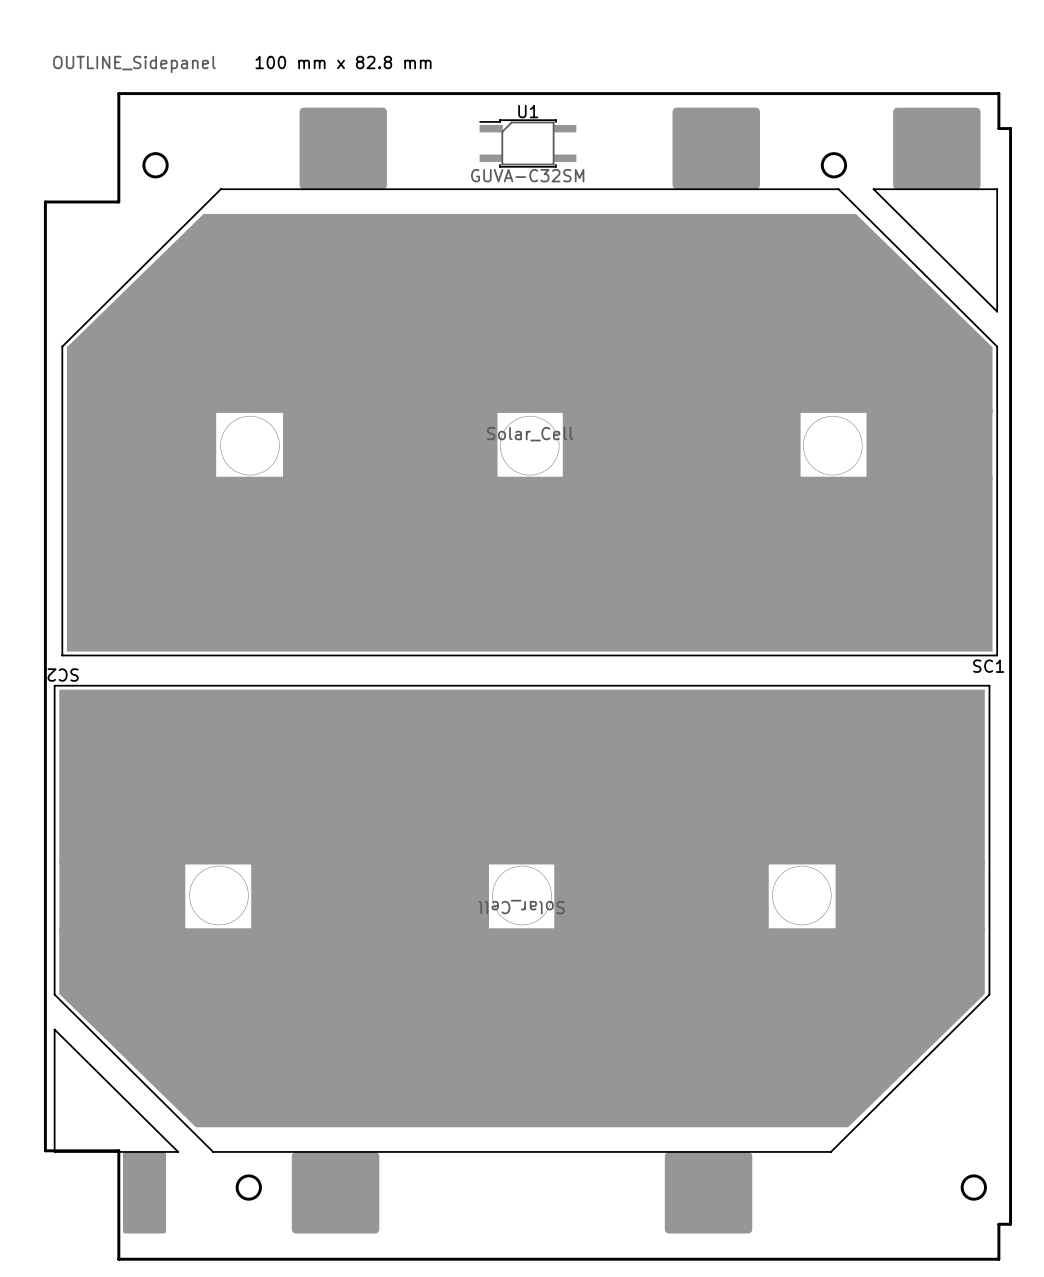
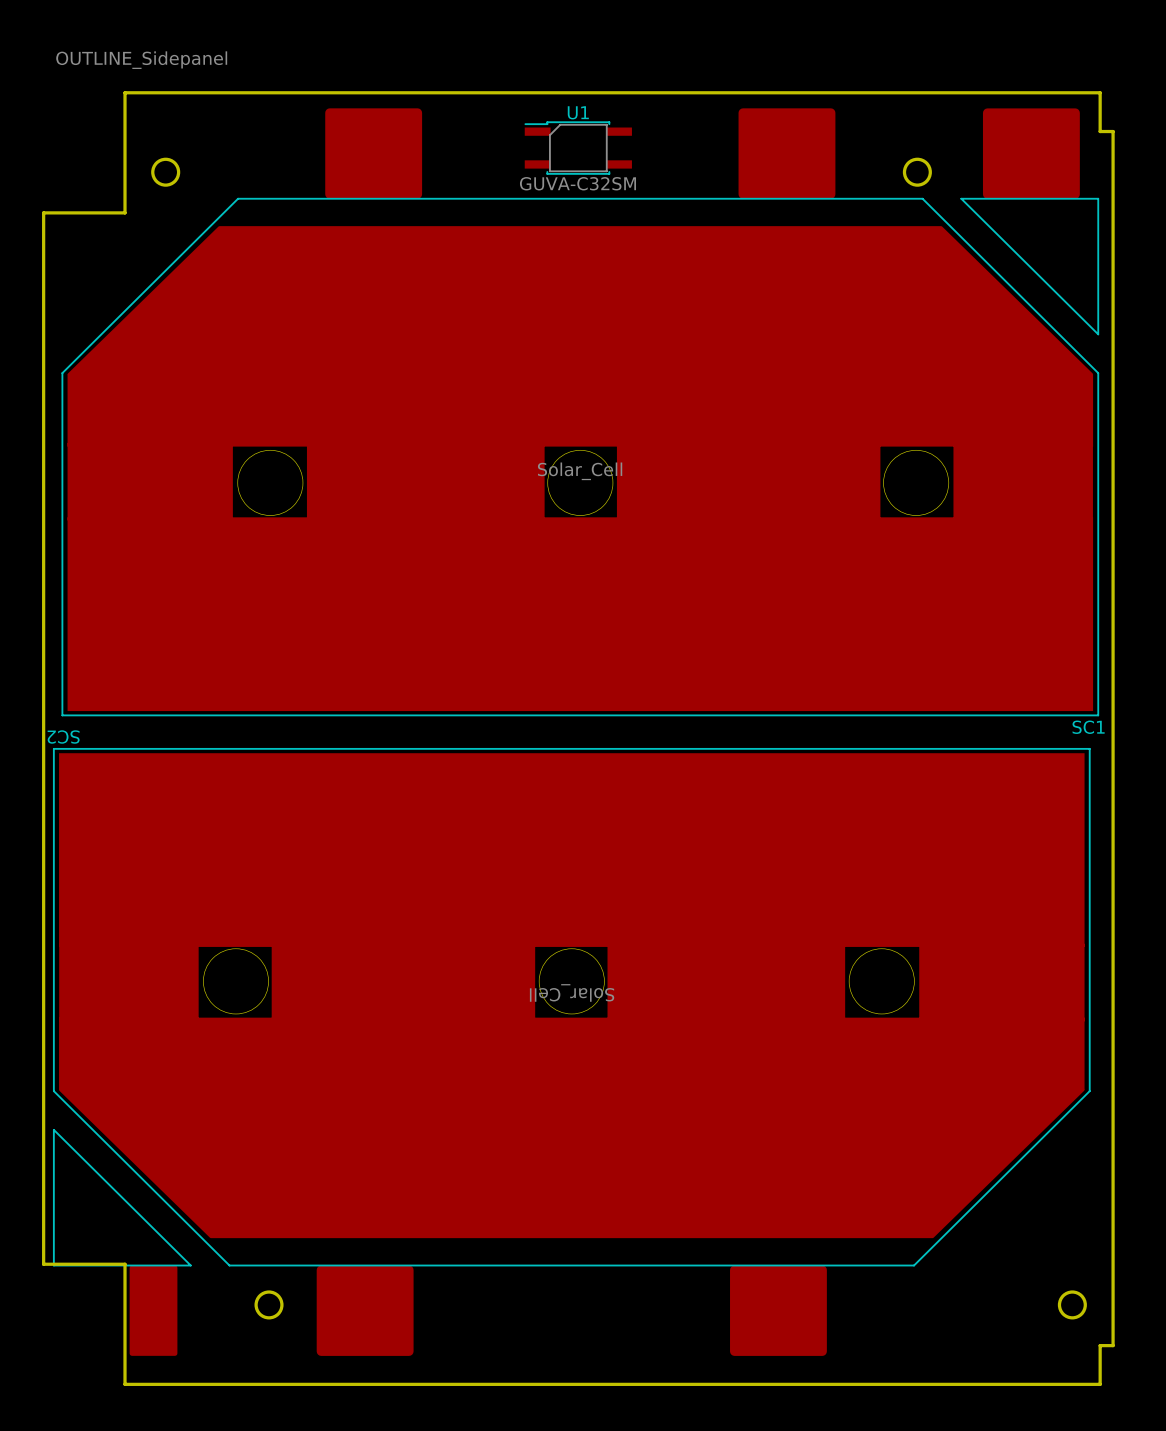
text: 100 mm x 82.8 mm (343, 62) -> none

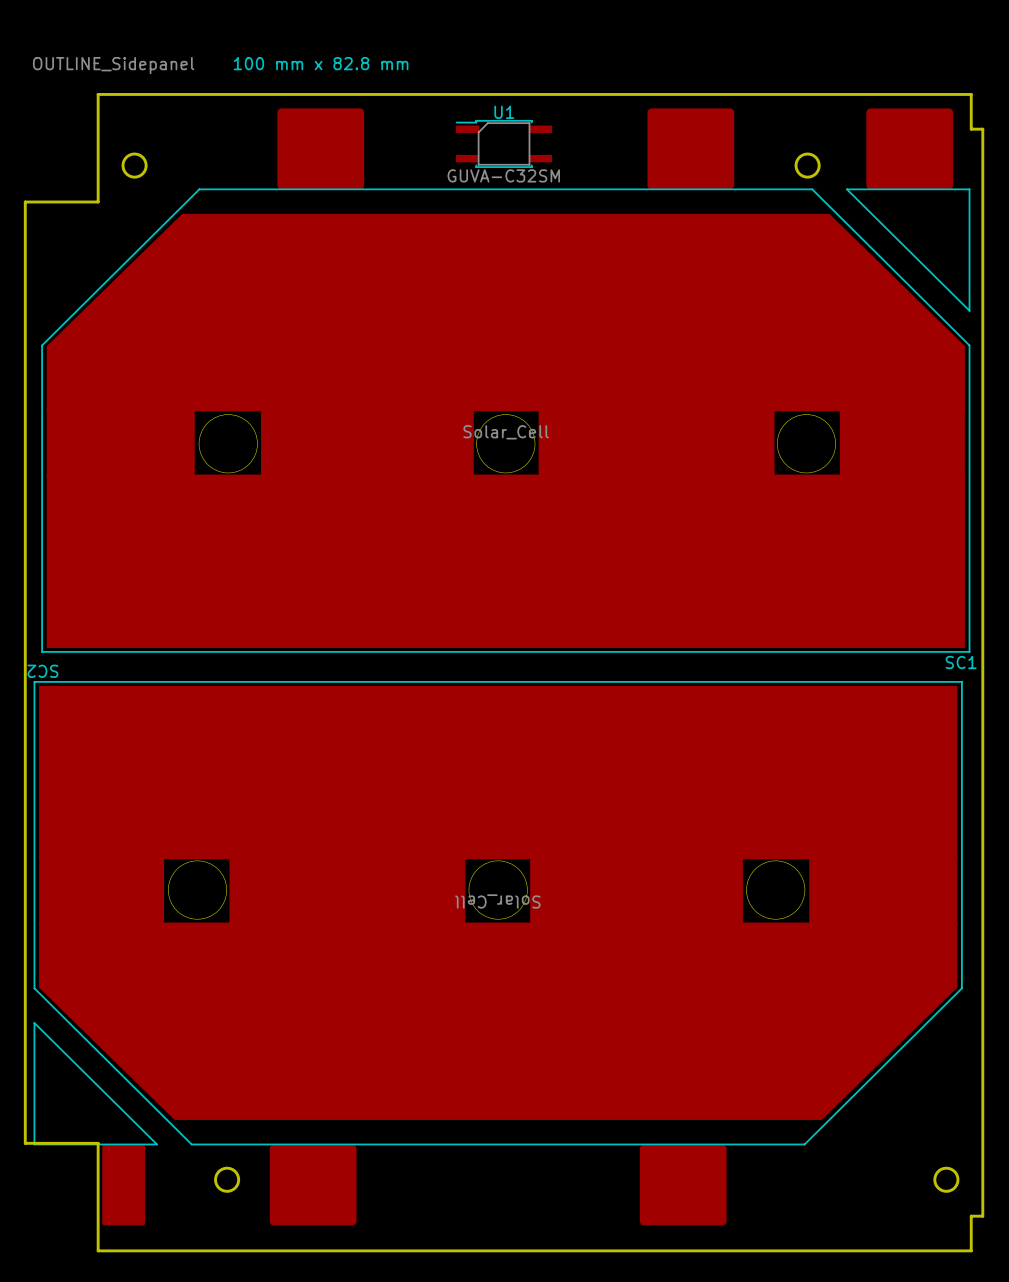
text: none -> 100 mm x 82.8 mm (321, 63)

